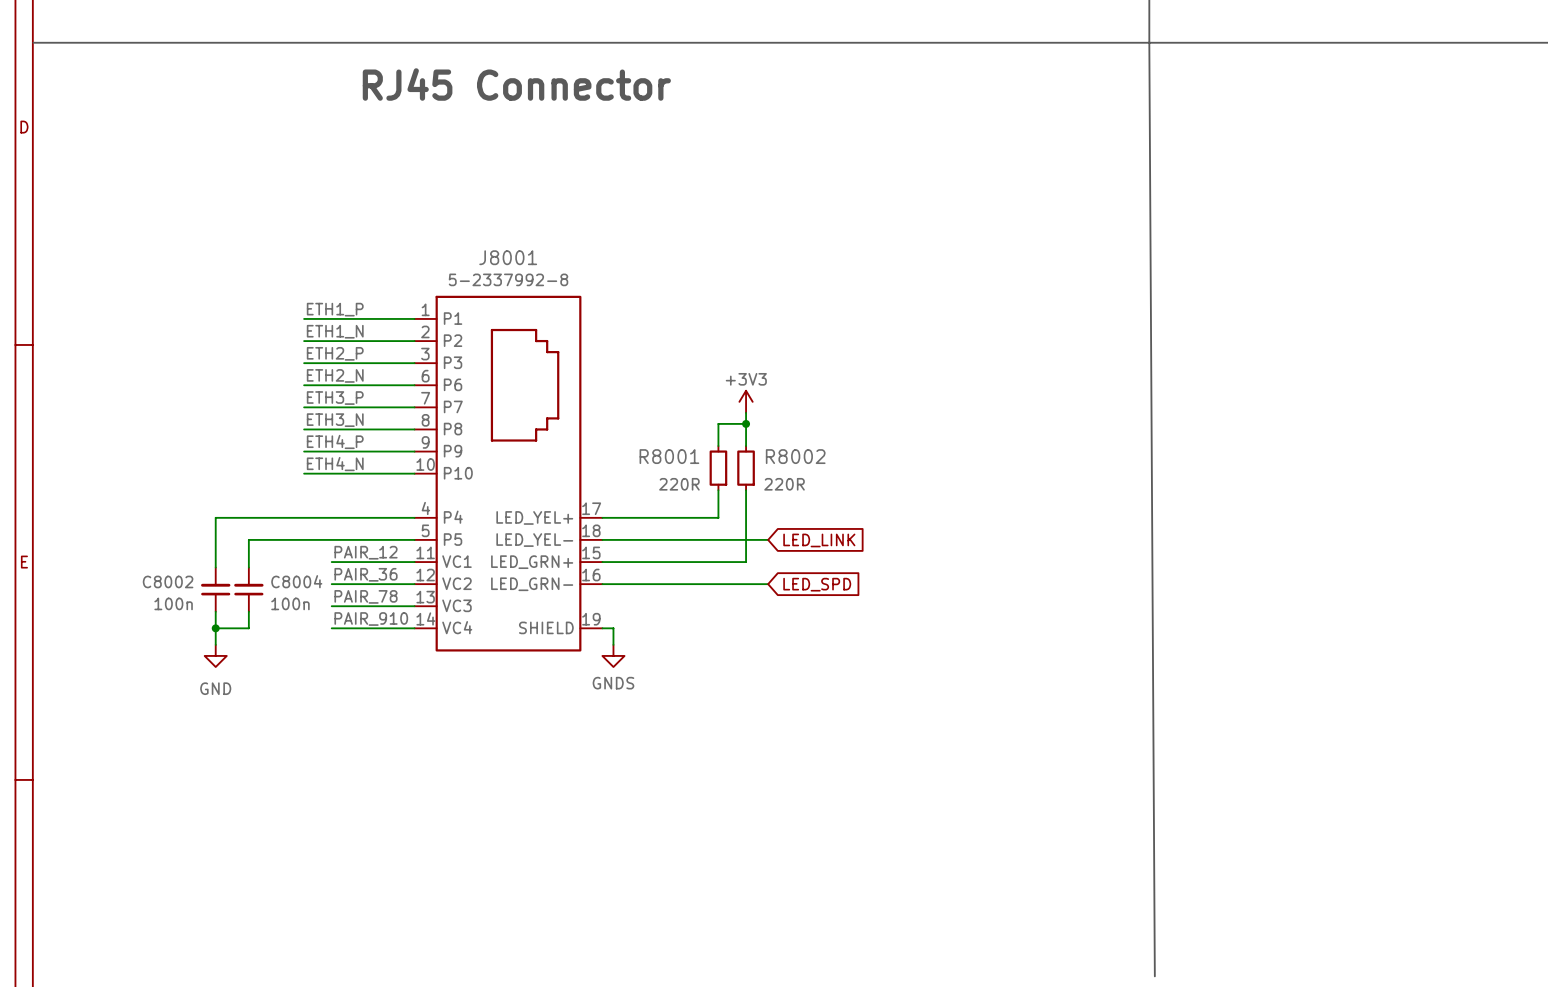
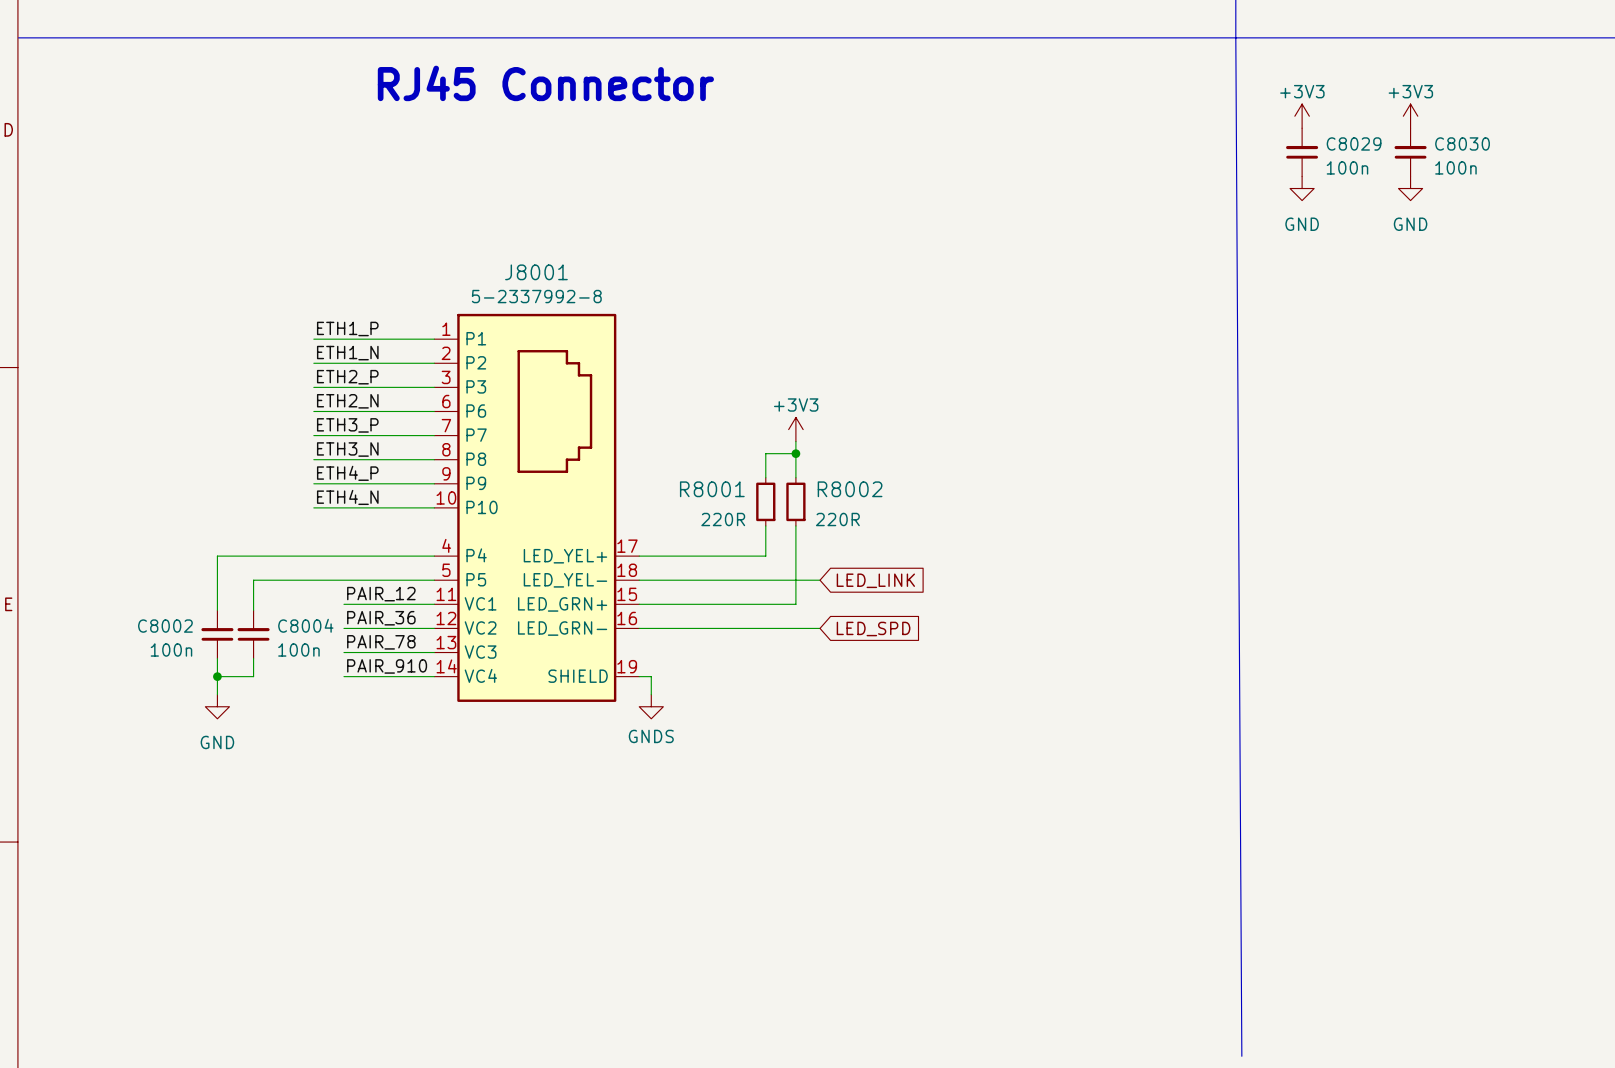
power symbol: none -> +3V3 (1302, 116)
power symbol: none -> +3V3 (1410, 116)
C8029: none -> (1302, 152)
C8030: none -> (1410, 152)
power symbol: none -> GND (1302, 188)
power symbol: none -> GND (1410, 188)

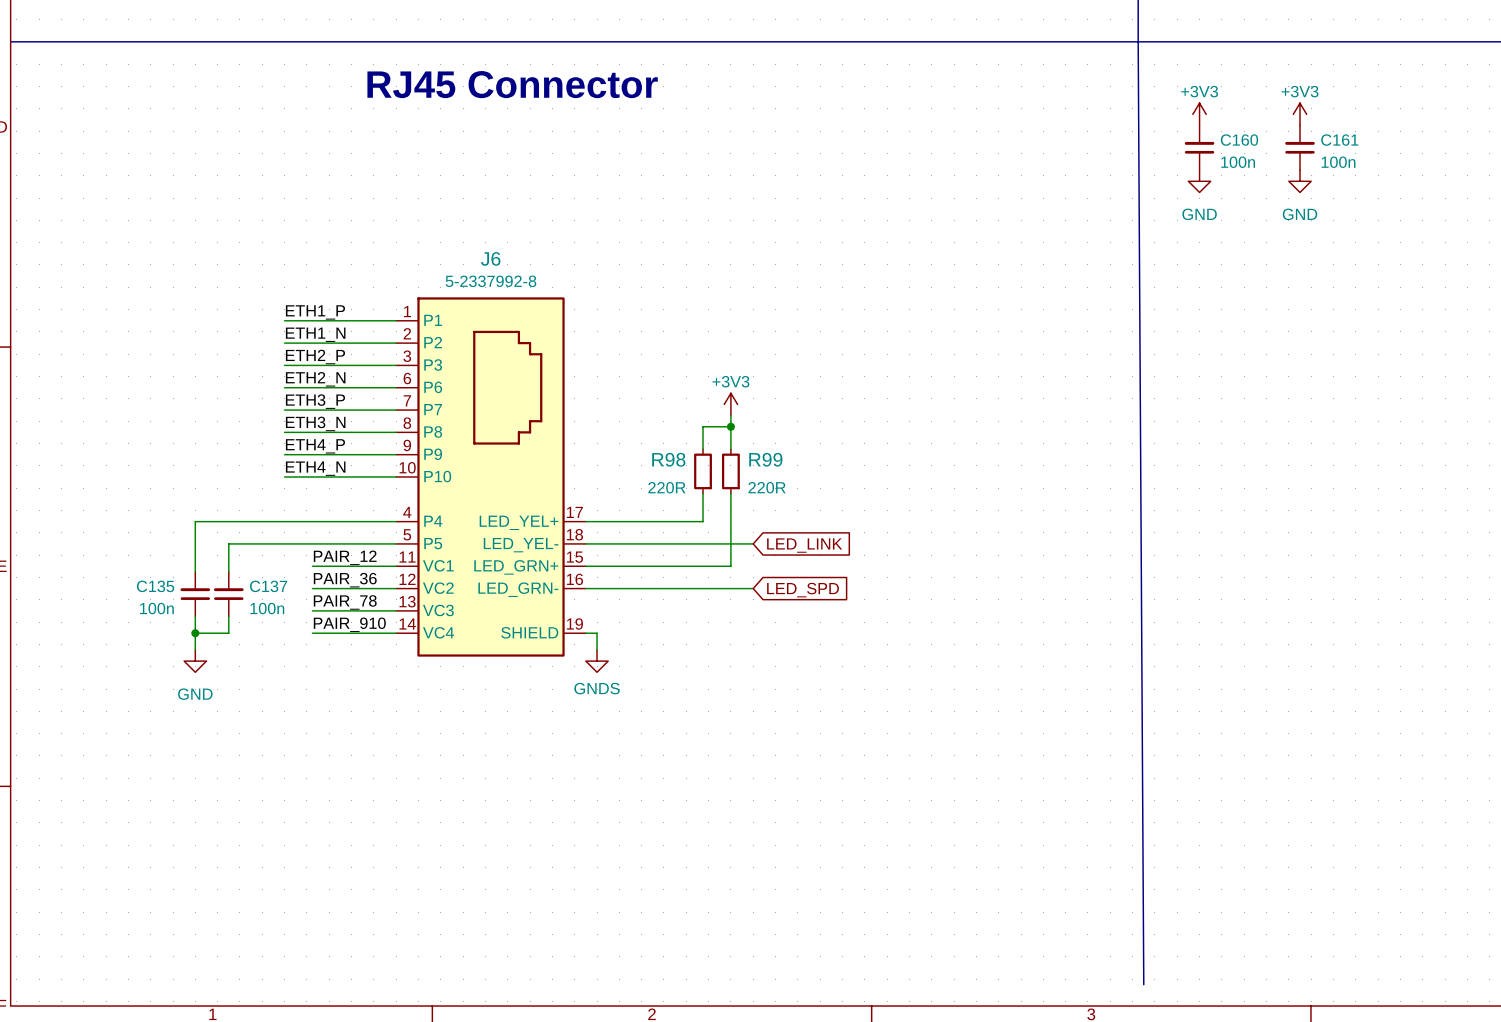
C8029 name: C8029 (1354, 143) -> C160 (1239, 140)
C8030 name: C8030 (1462, 143) -> C161 (1339, 140)
J8001 name: J8001 (536, 272) -> J6 (490, 258)
R8001 name: R8001 (712, 489) -> R98 (668, 459)
R8002 name: R8002 (850, 489) -> R99 (765, 459)
C8004 name: C8004 (305, 625) -> C137 (268, 586)
C8002 name: C8002 (165, 626) -> C135 (155, 586)

